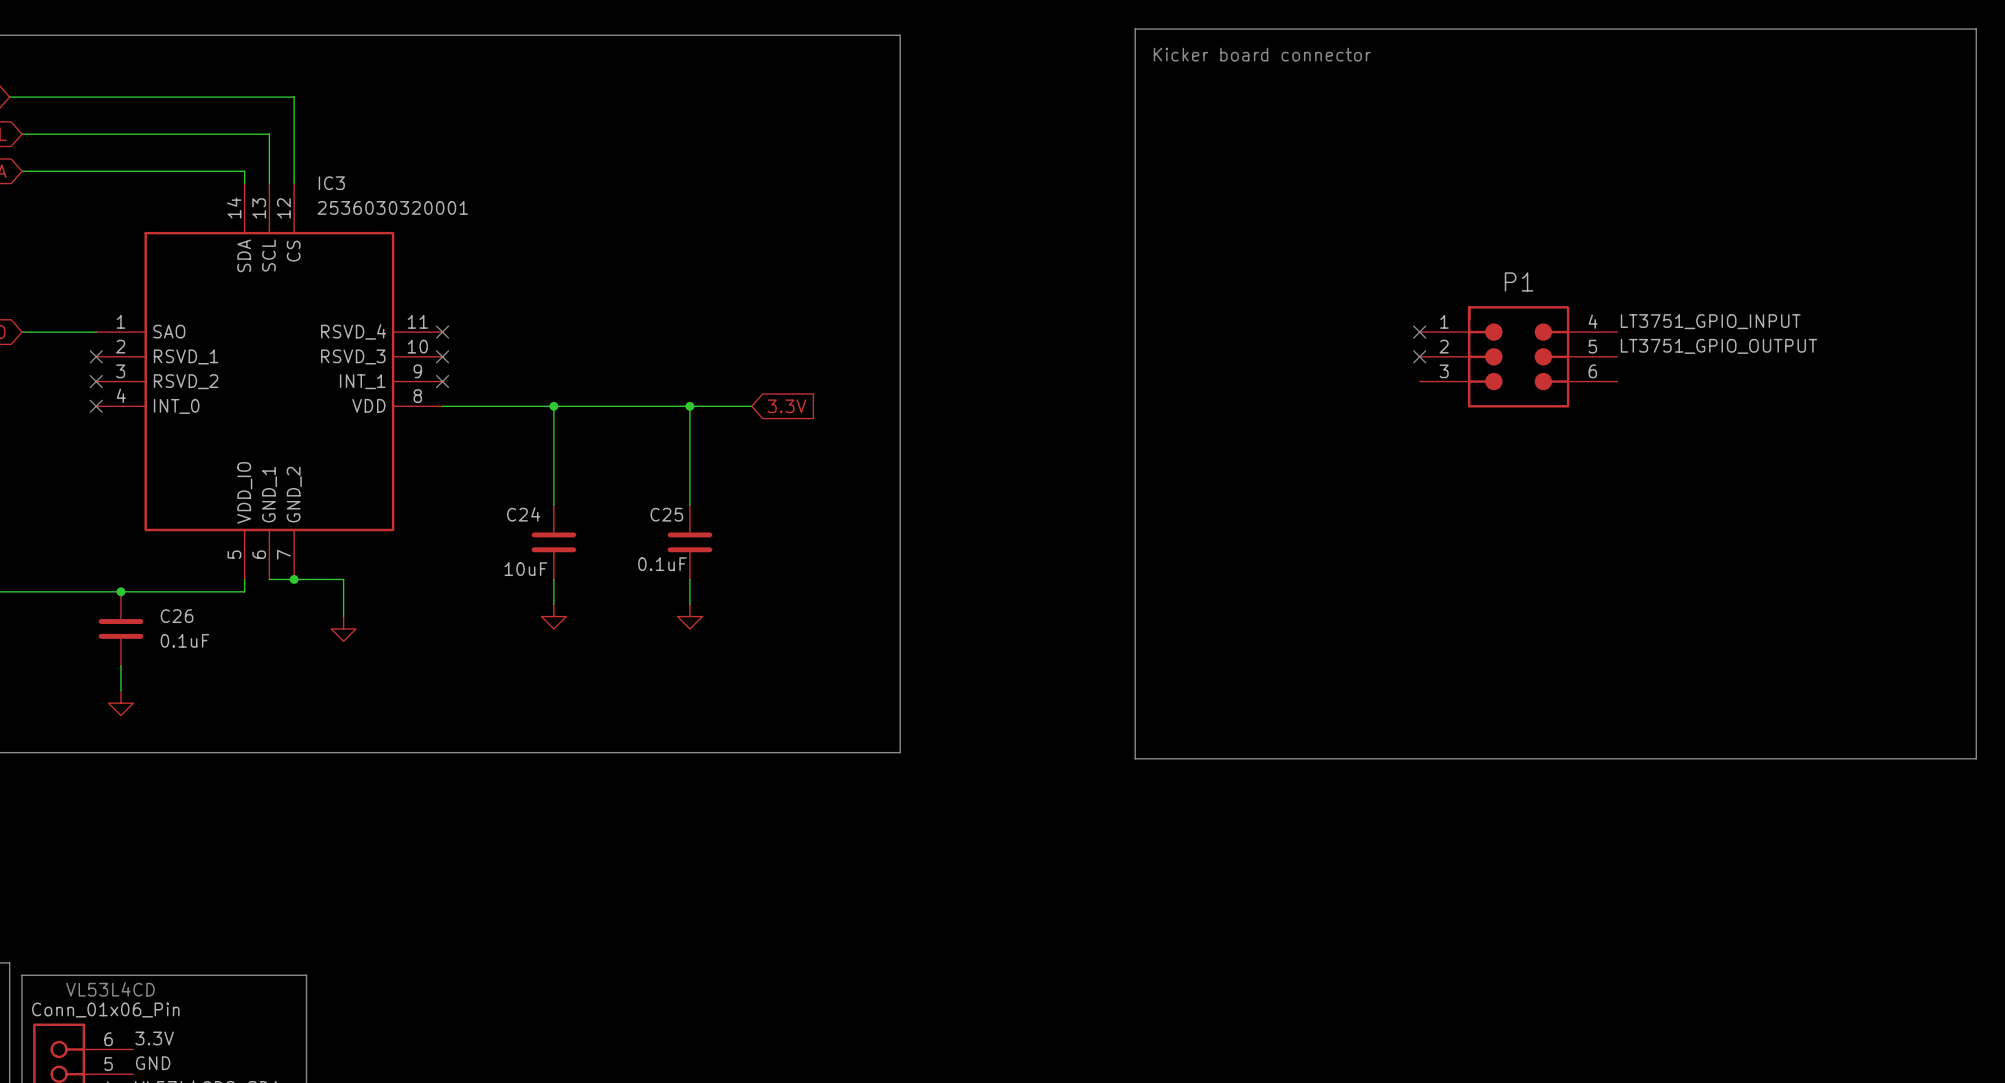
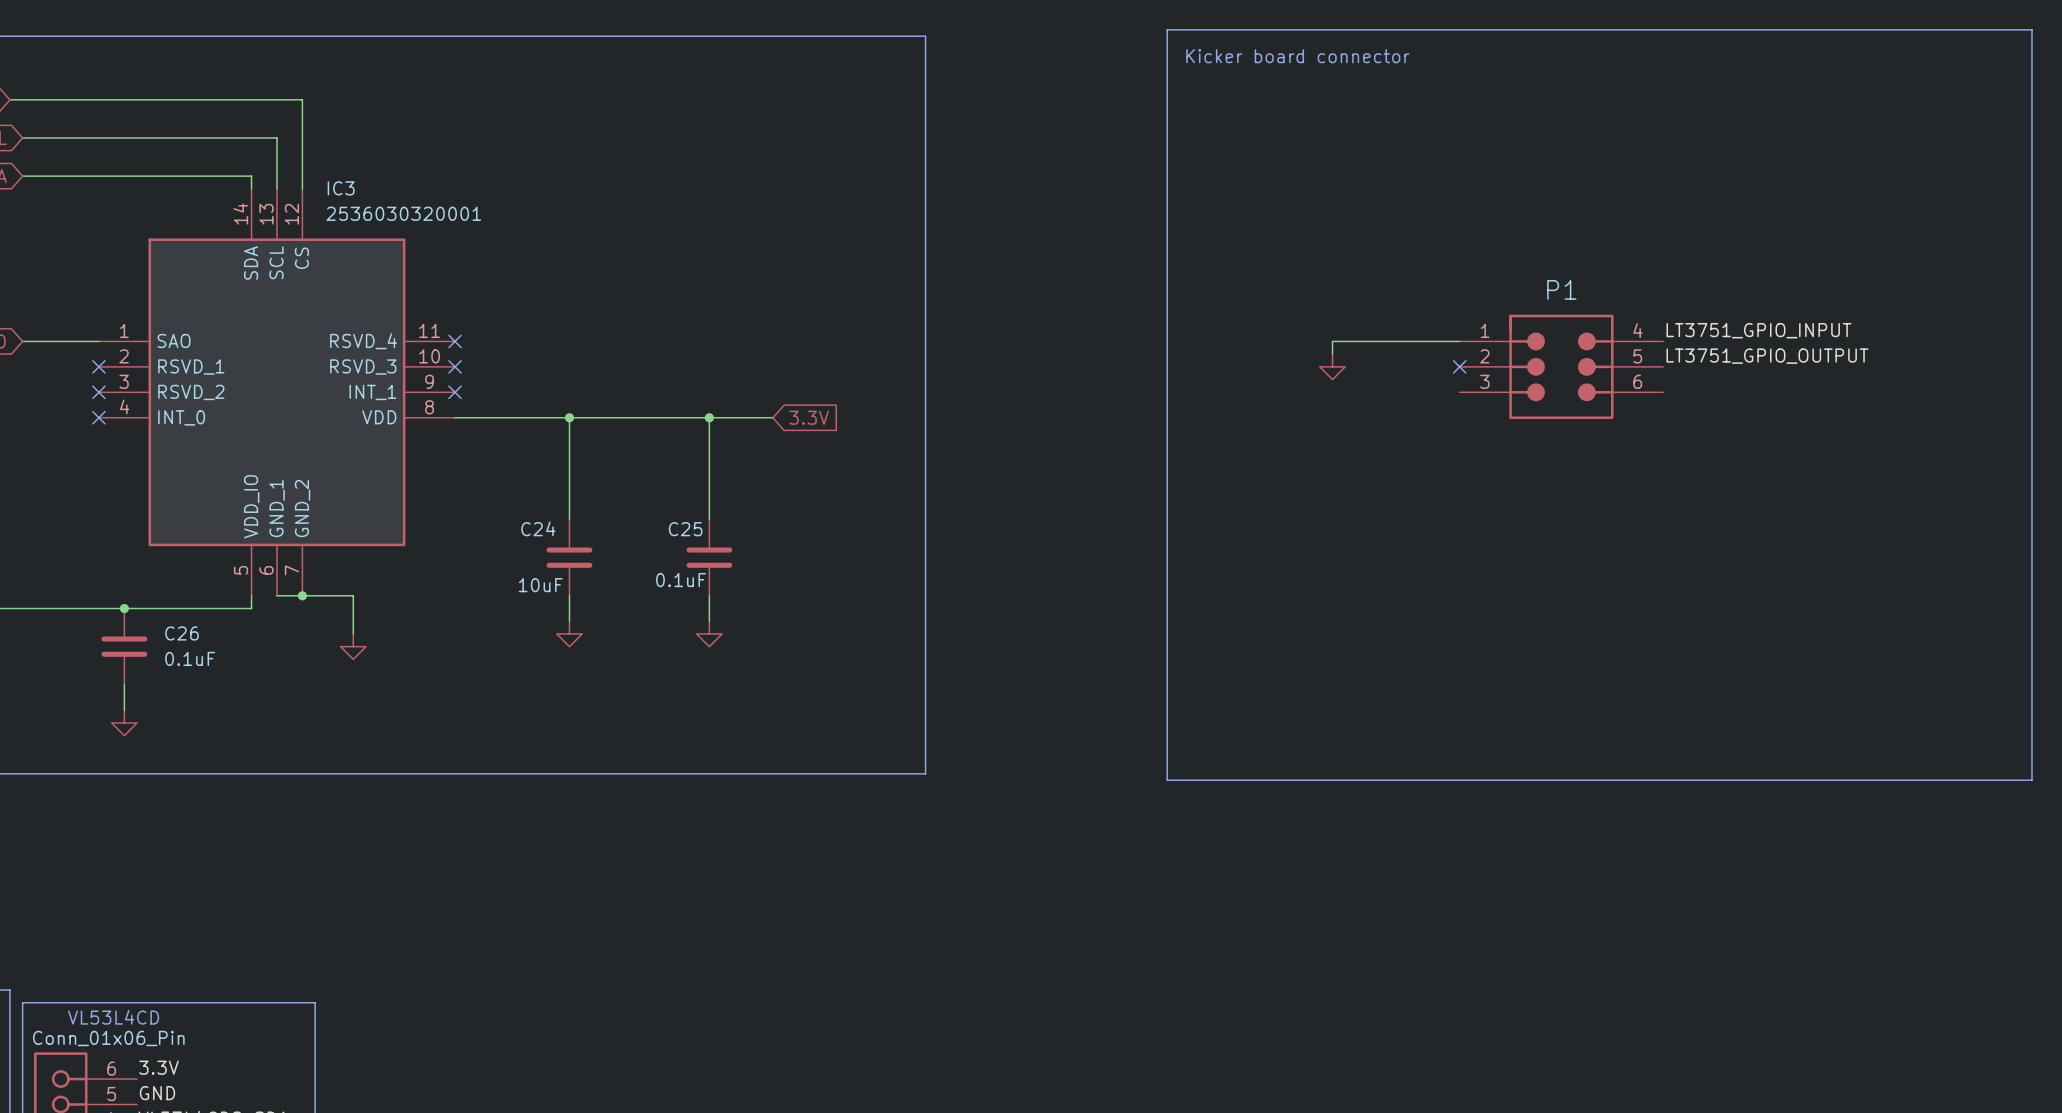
wire: none -> (1459, 341) (1332, 341) (1332, 354)
no-connect mark: (1419, 332) -> none
power symbol: none -> (1332, 366)

